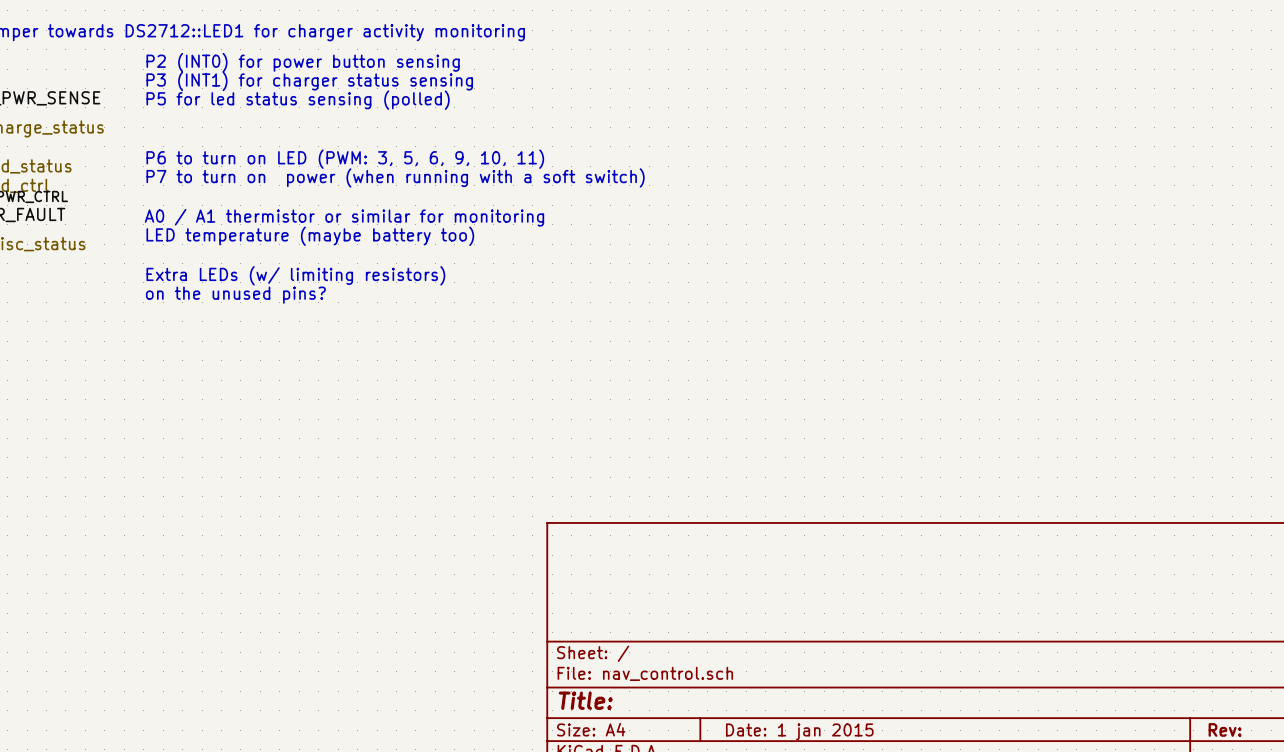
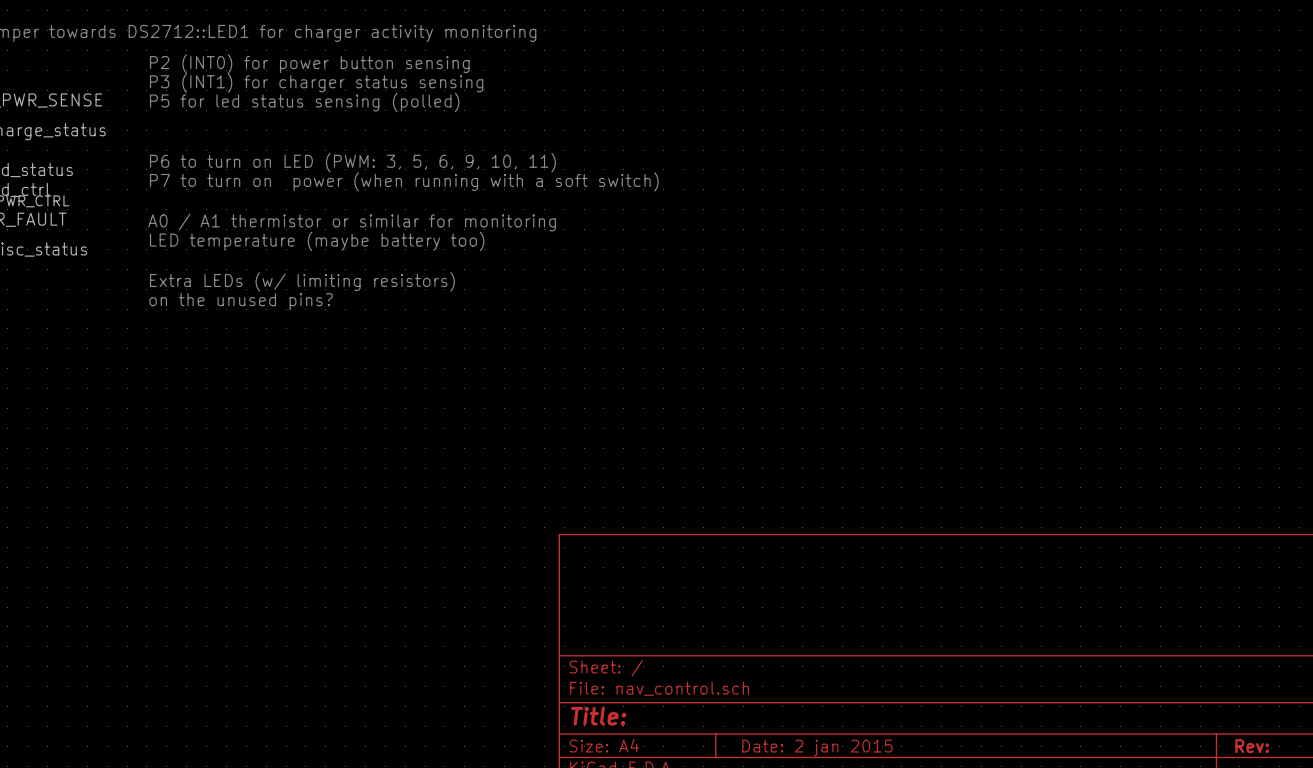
title block: Date: 1 jan 2015 (799, 731) -> Date: 2 jan 2015 (817, 748)

